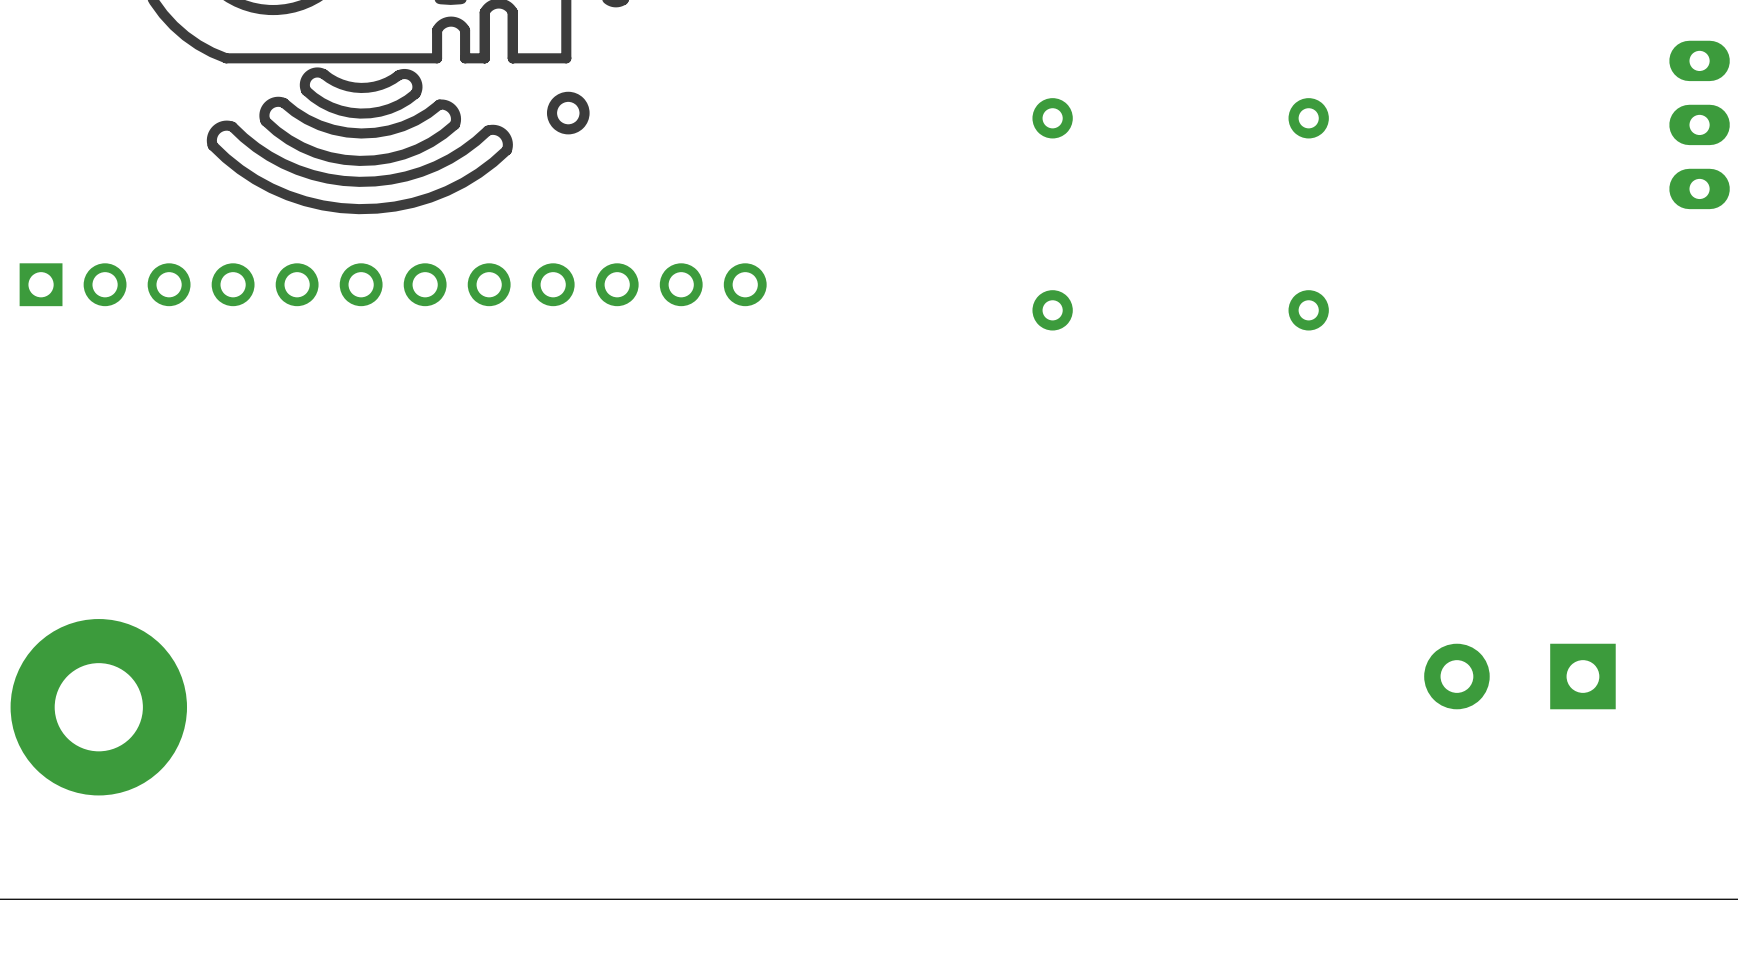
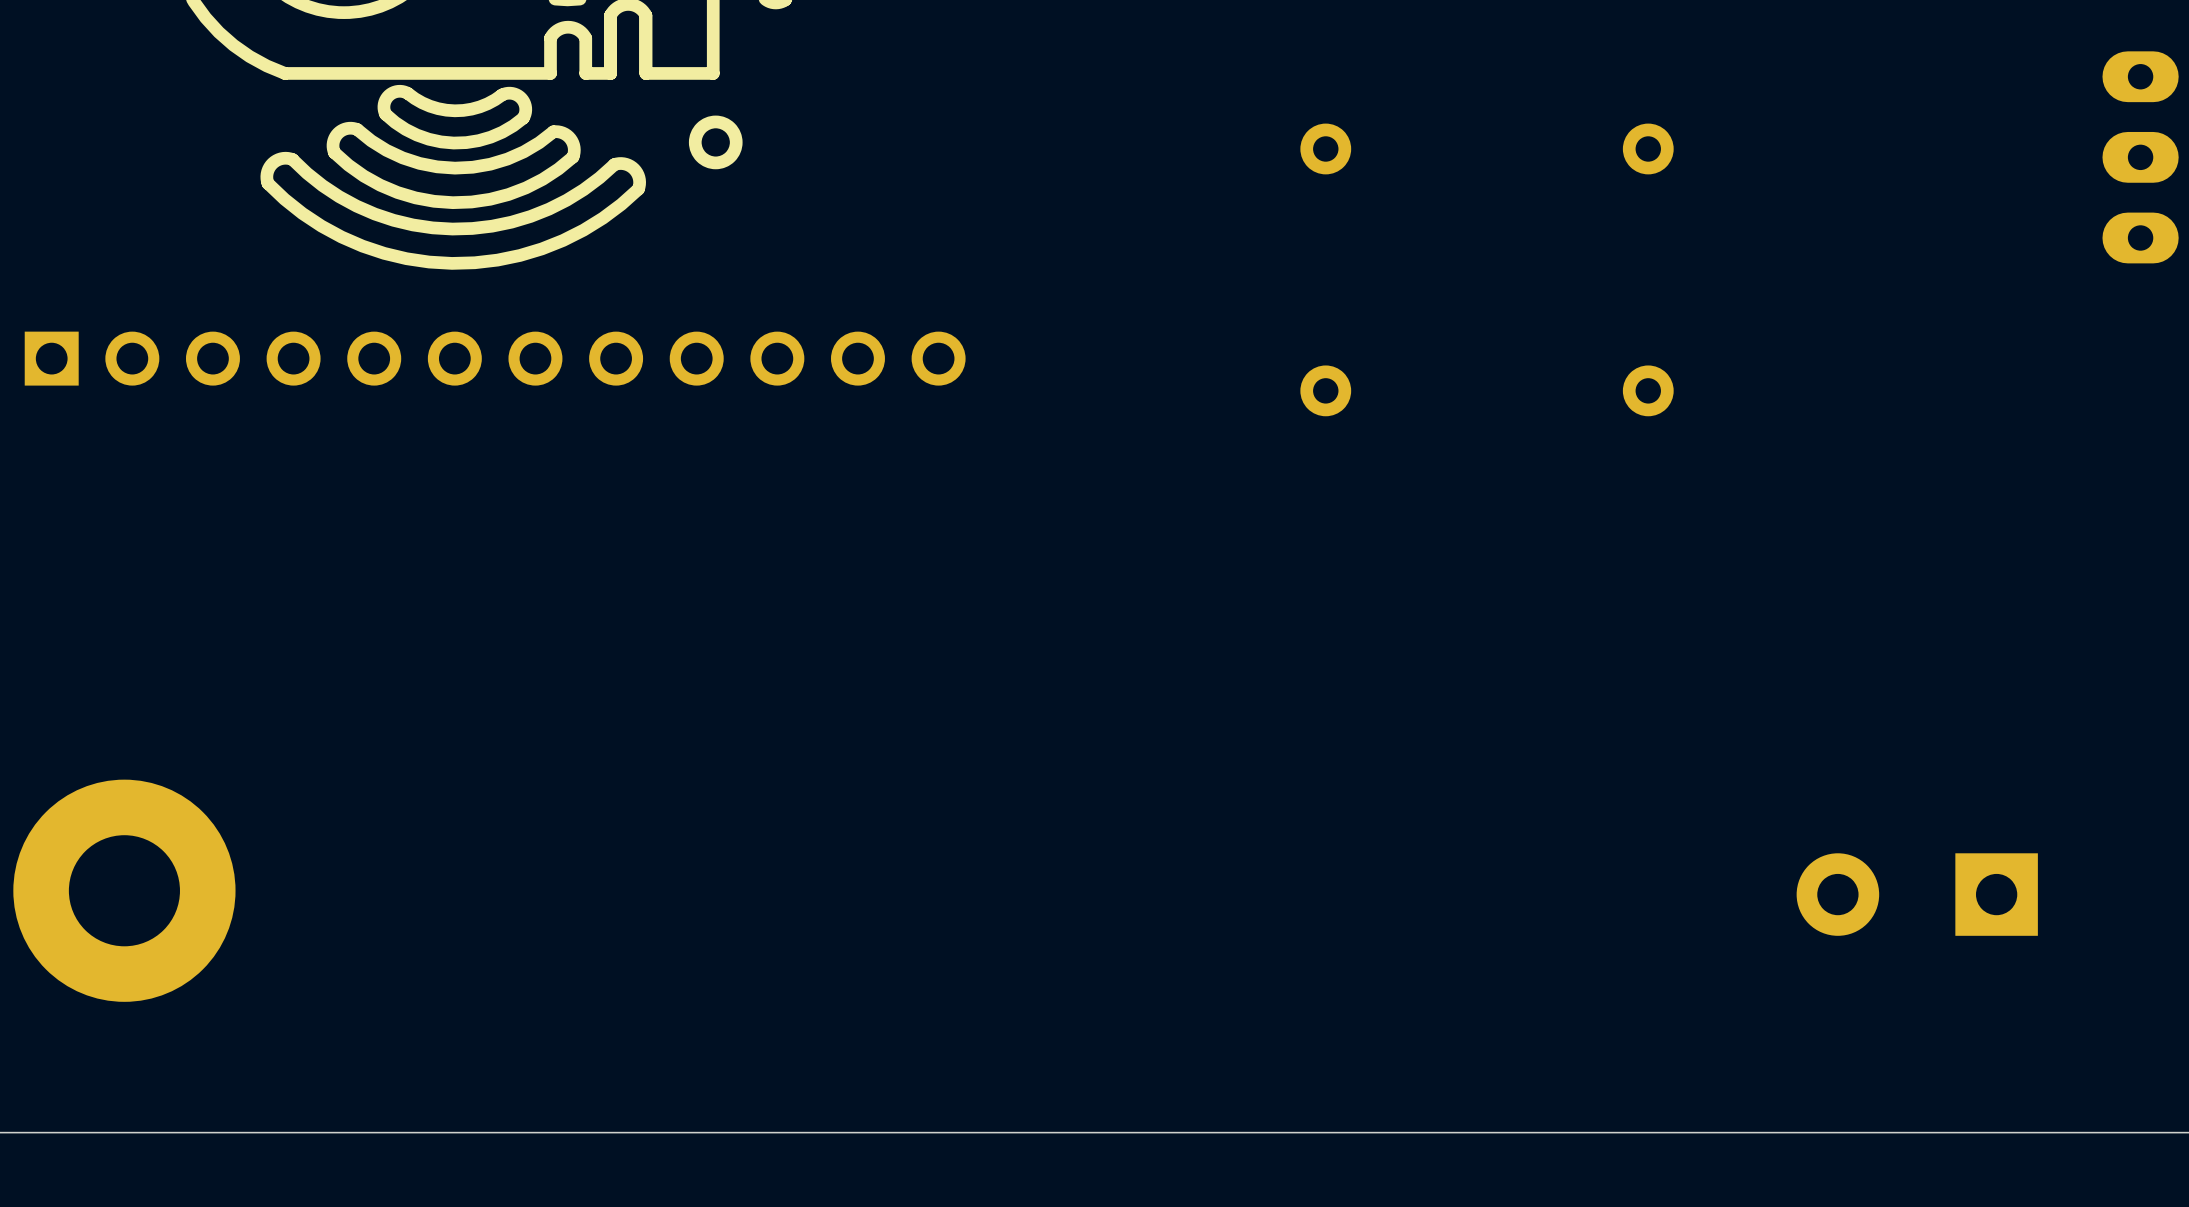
part position: (1519, 676) -> (1917, 894)

